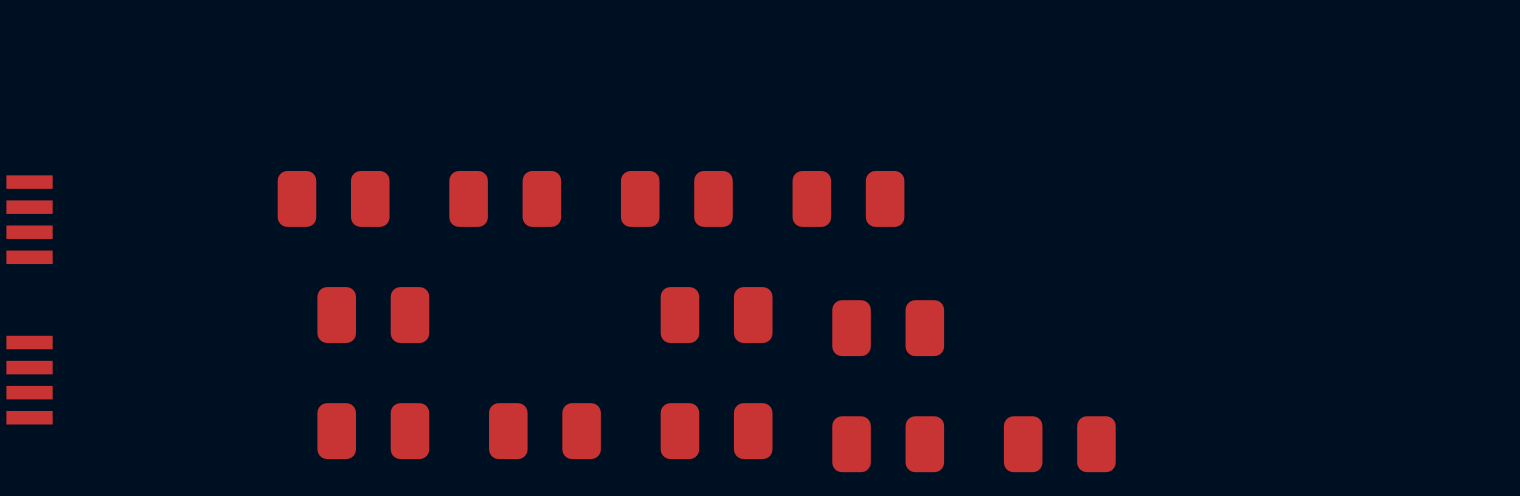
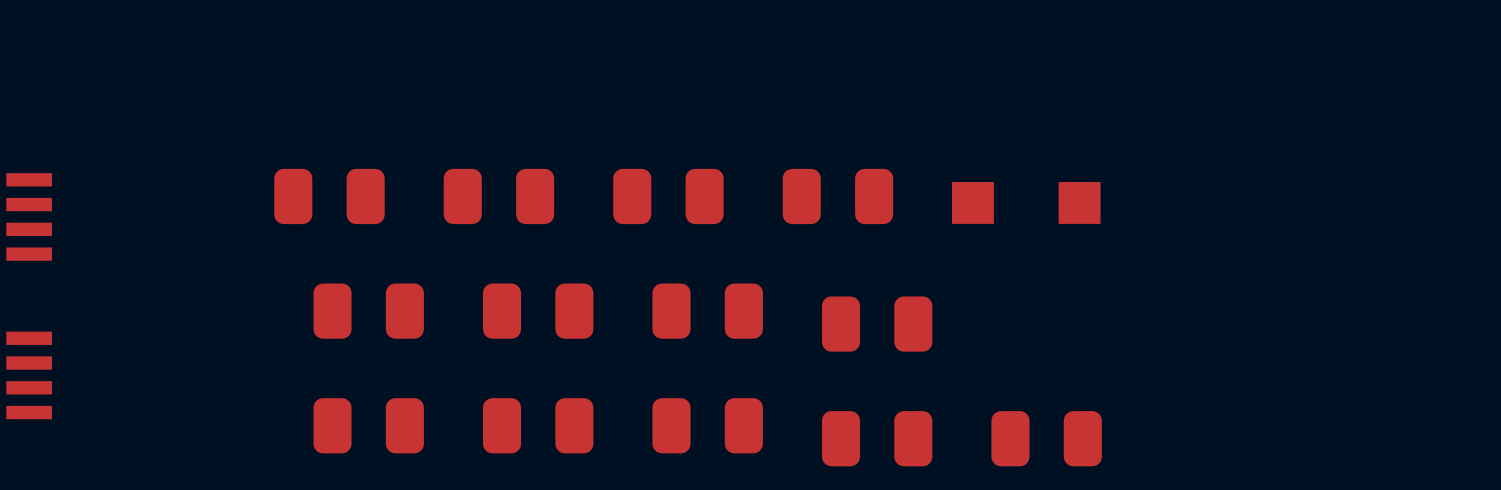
part: none -> (1026, 202)
part: none -> (538, 311)

